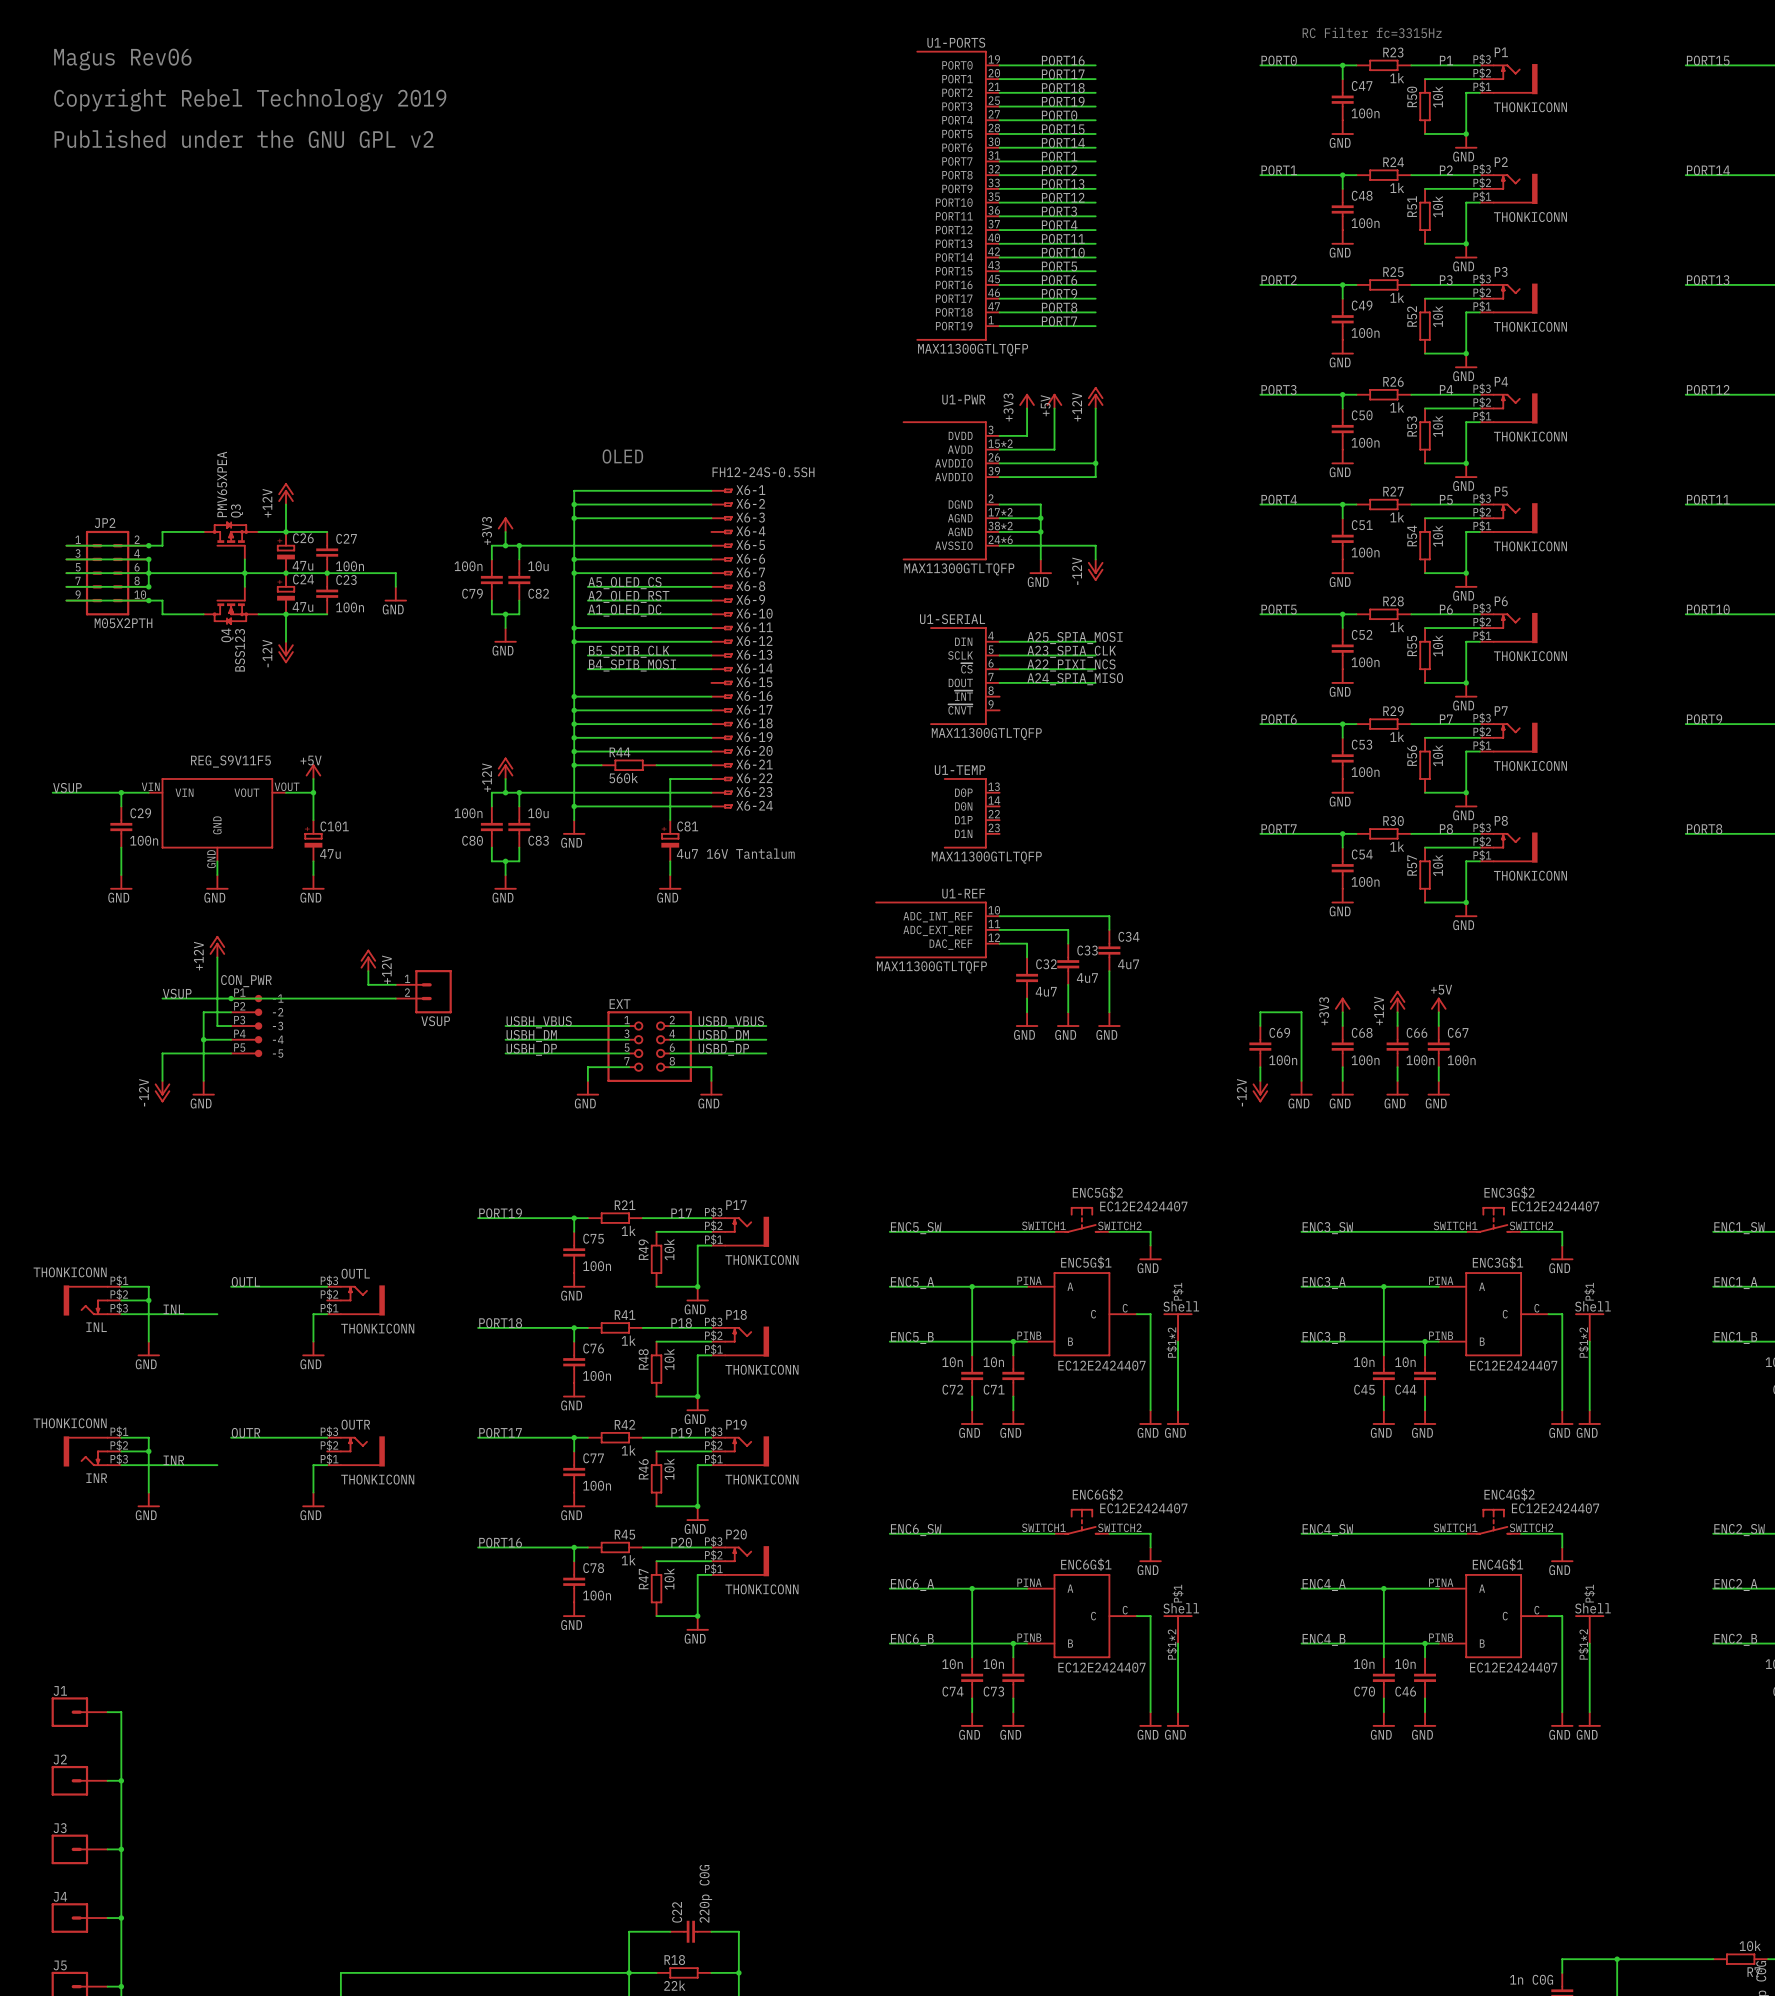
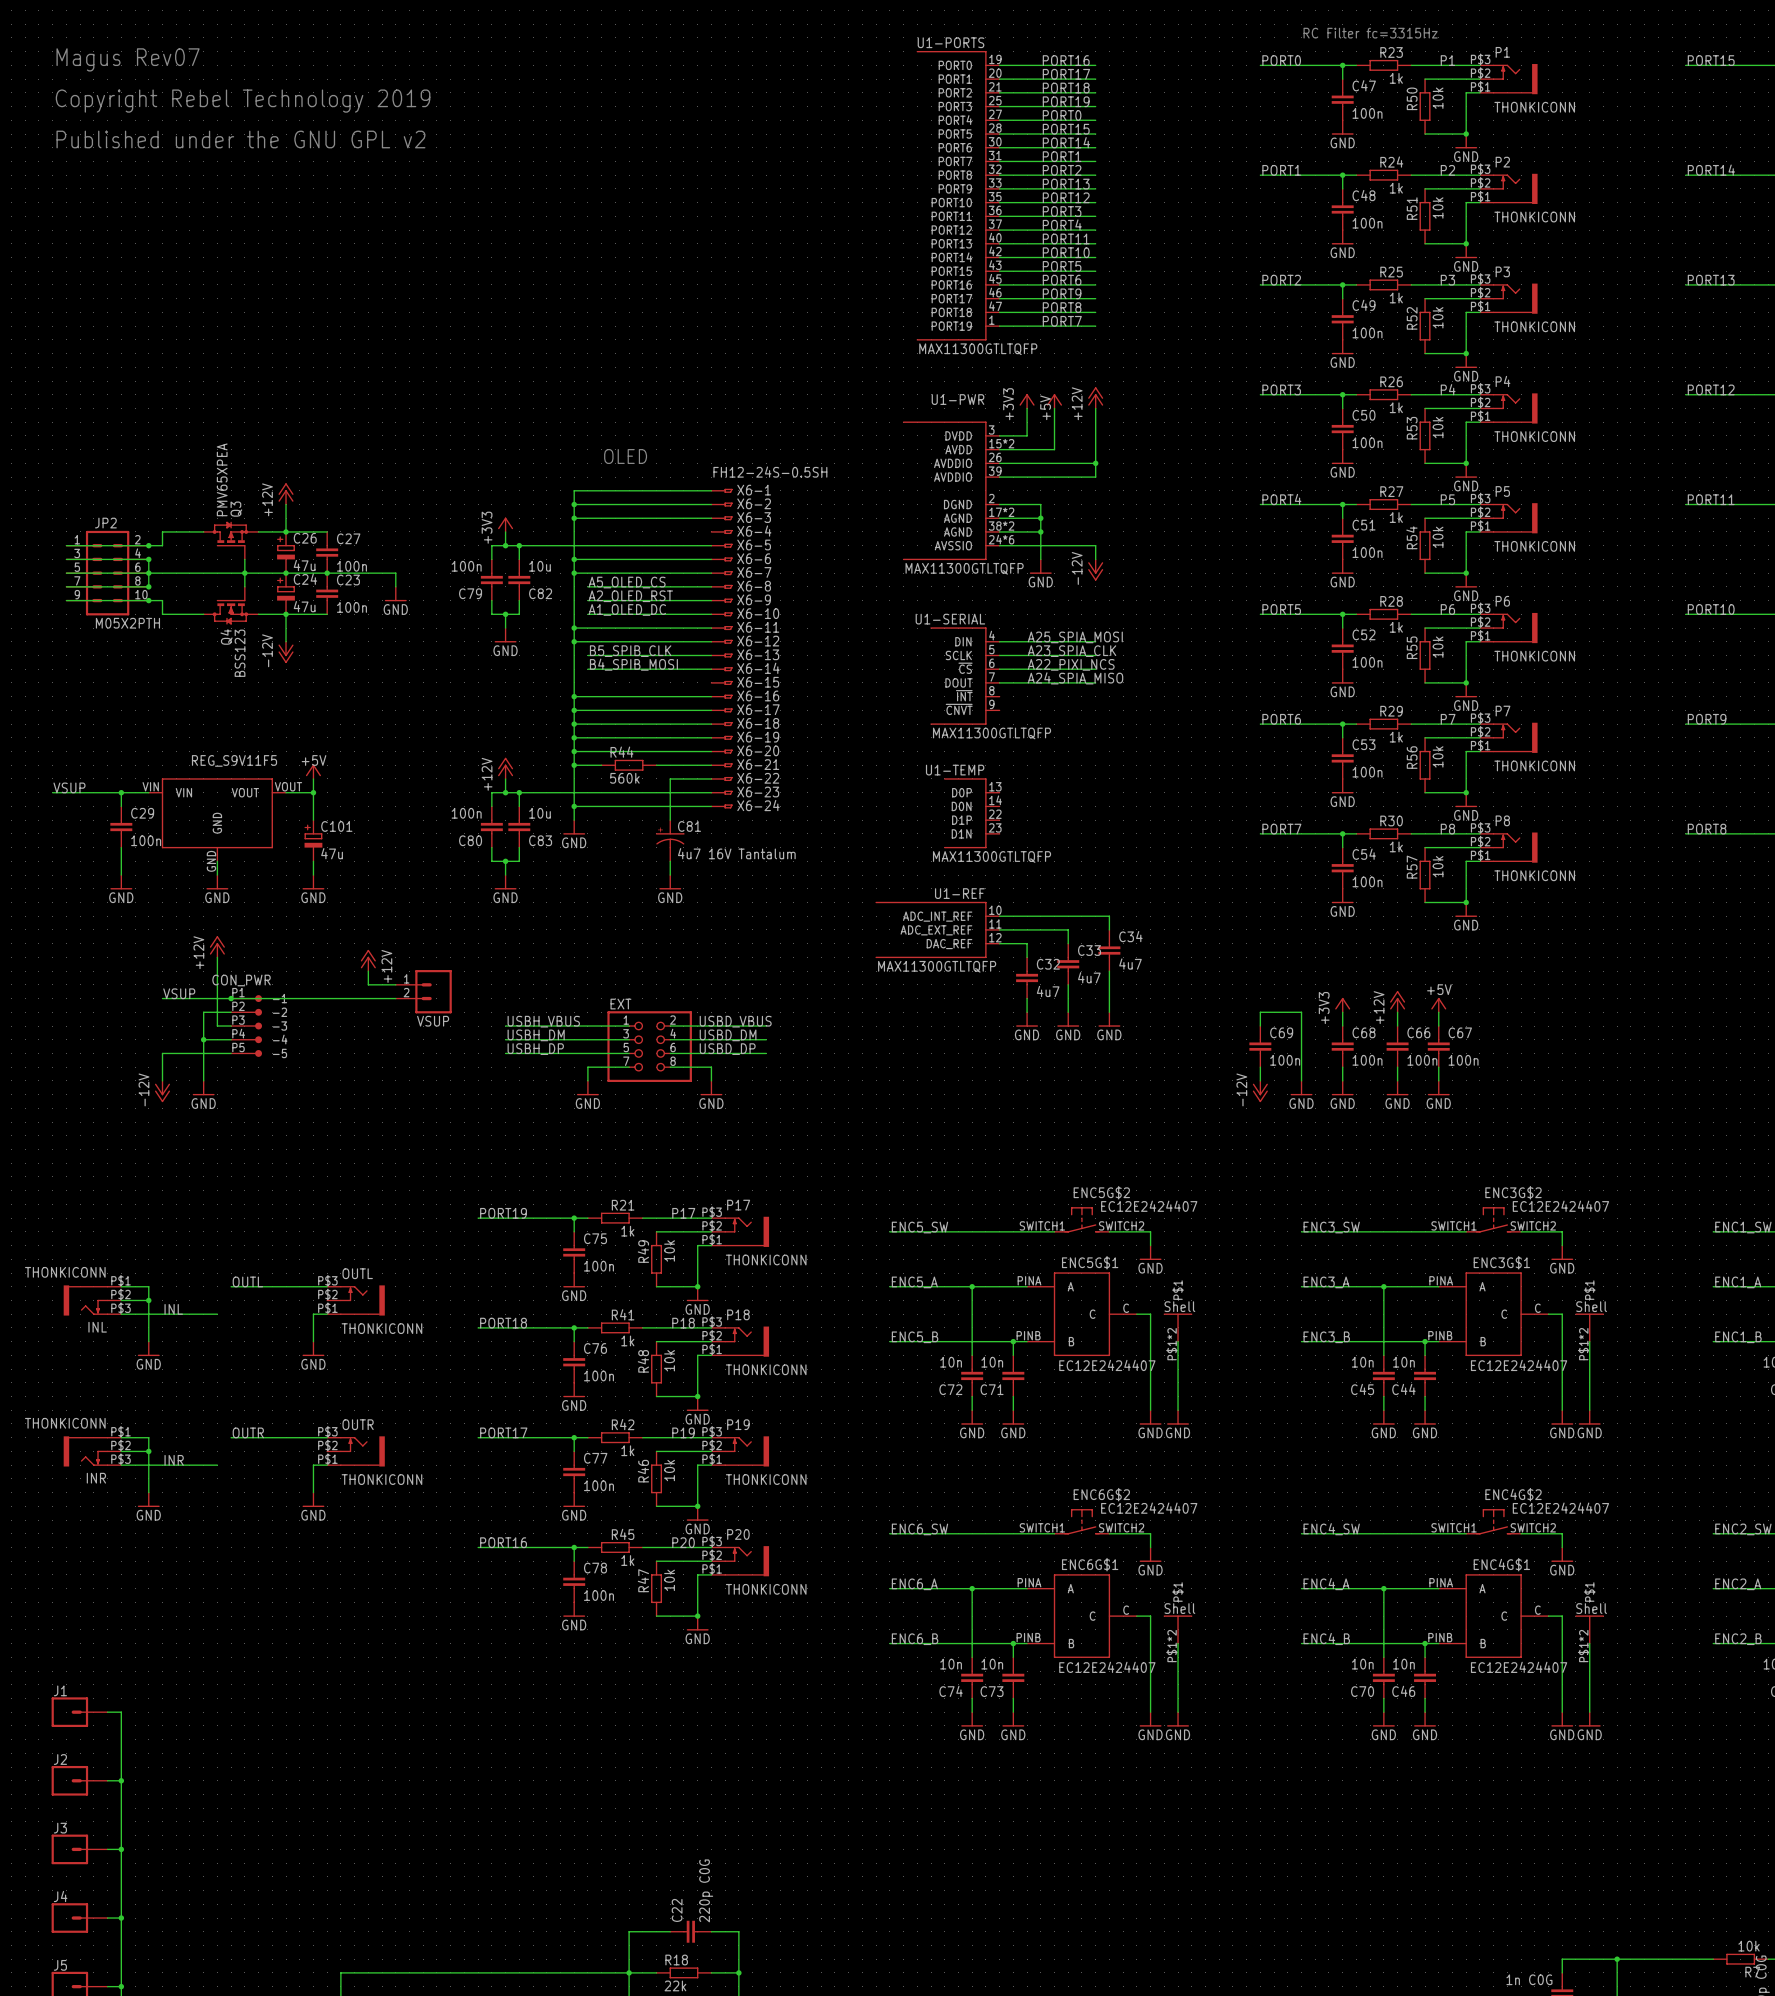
text: Magus Rev06 (122, 59) -> Magus Rev07 (128, 59)
C81 symbol: [661, 820, 680, 862] -> [655, 820, 685, 862]

